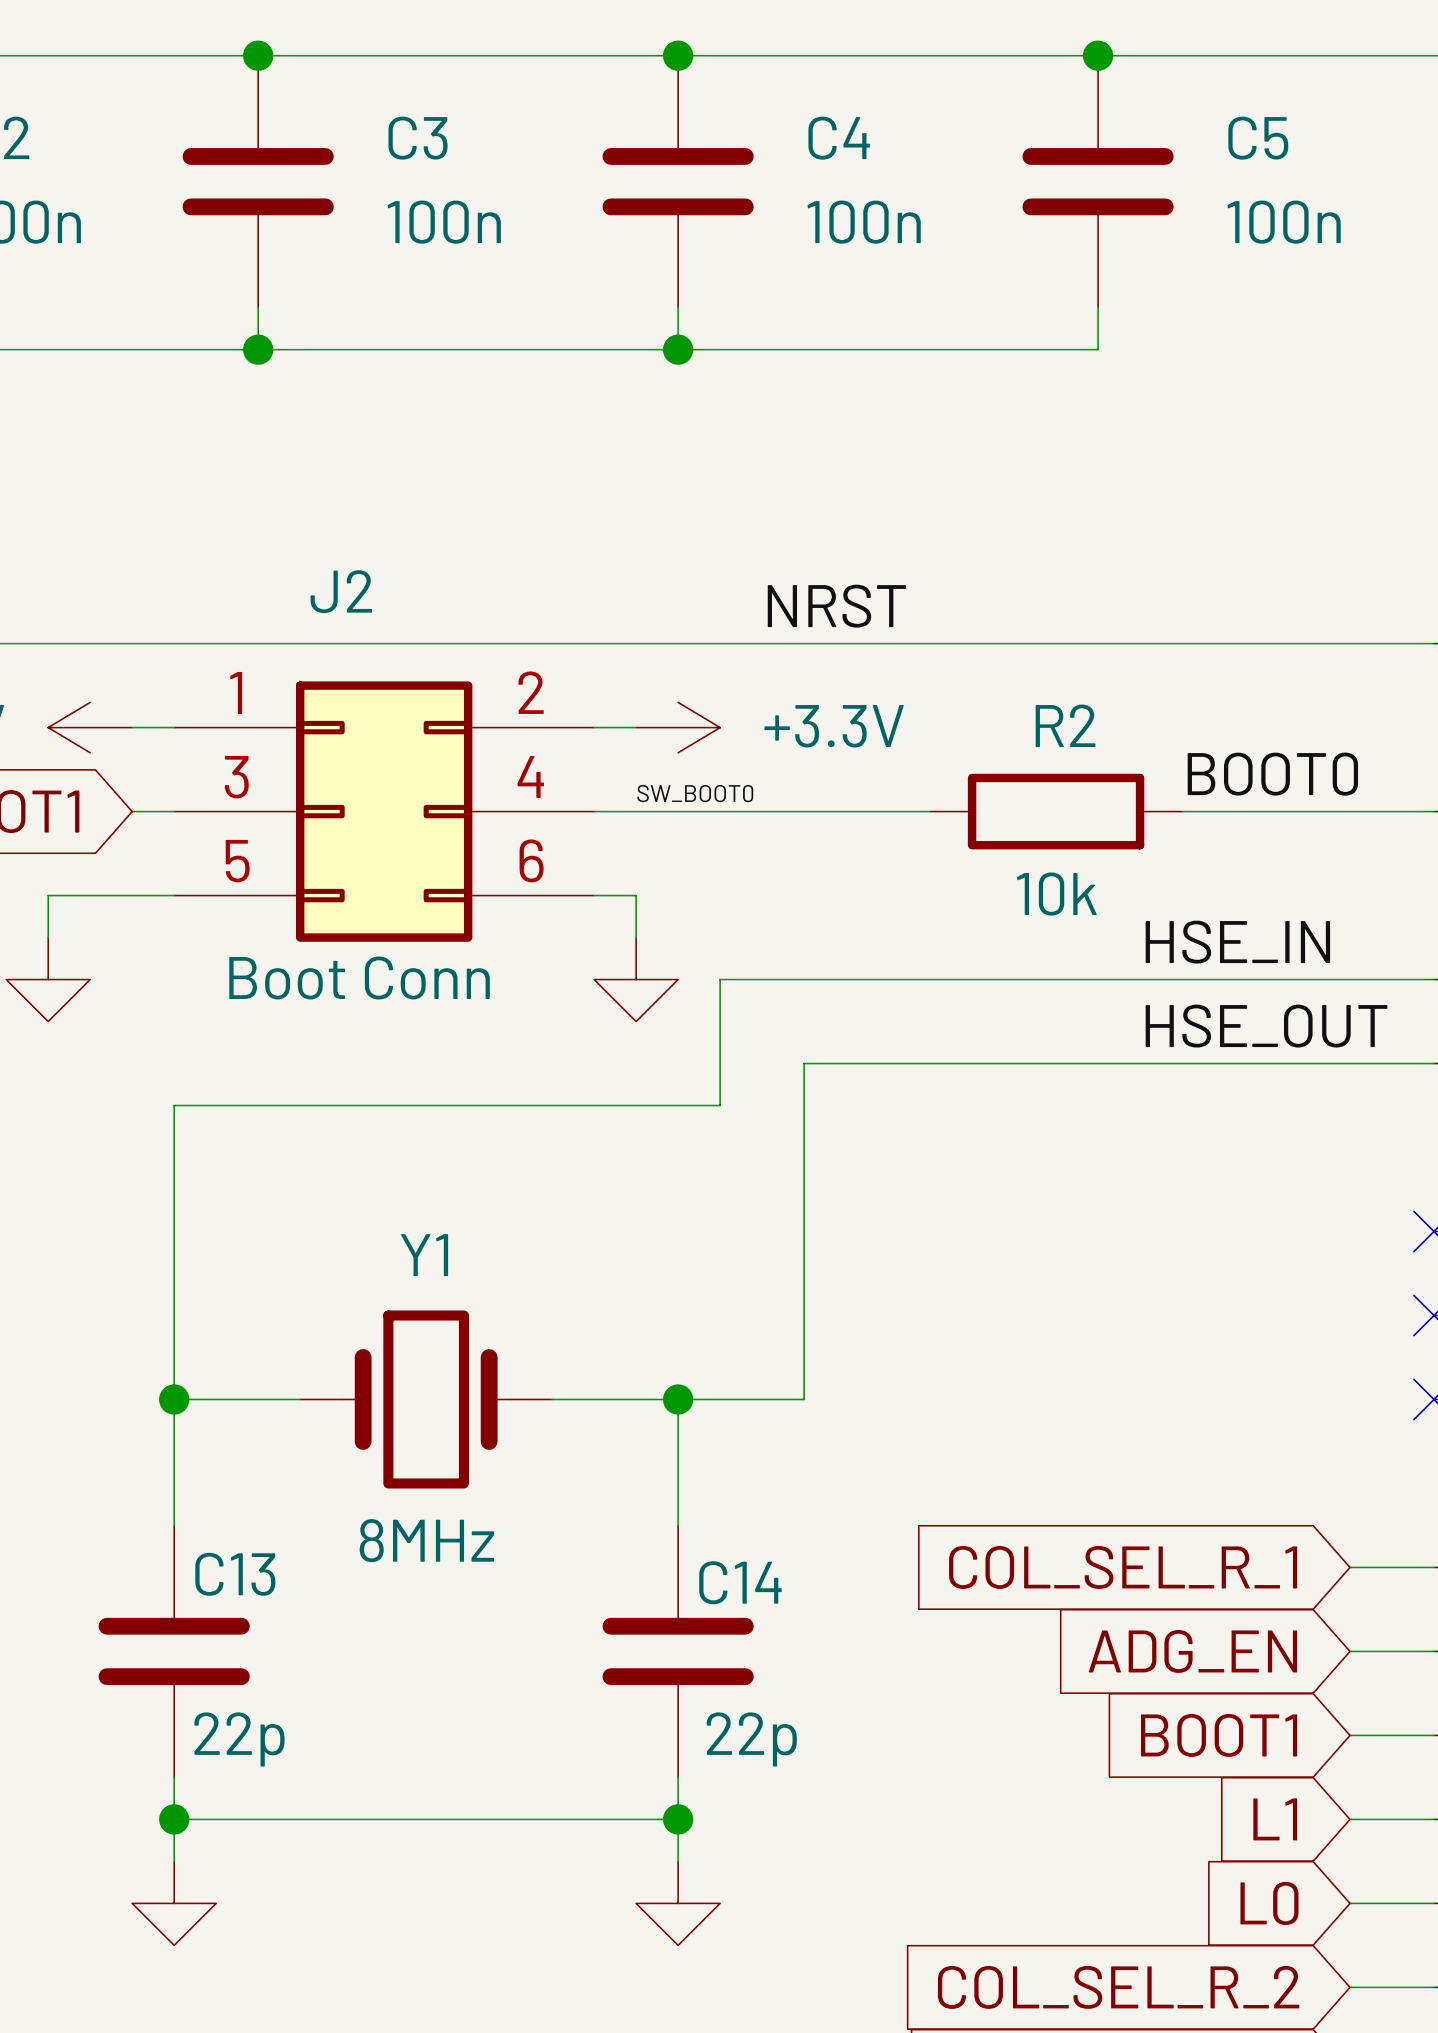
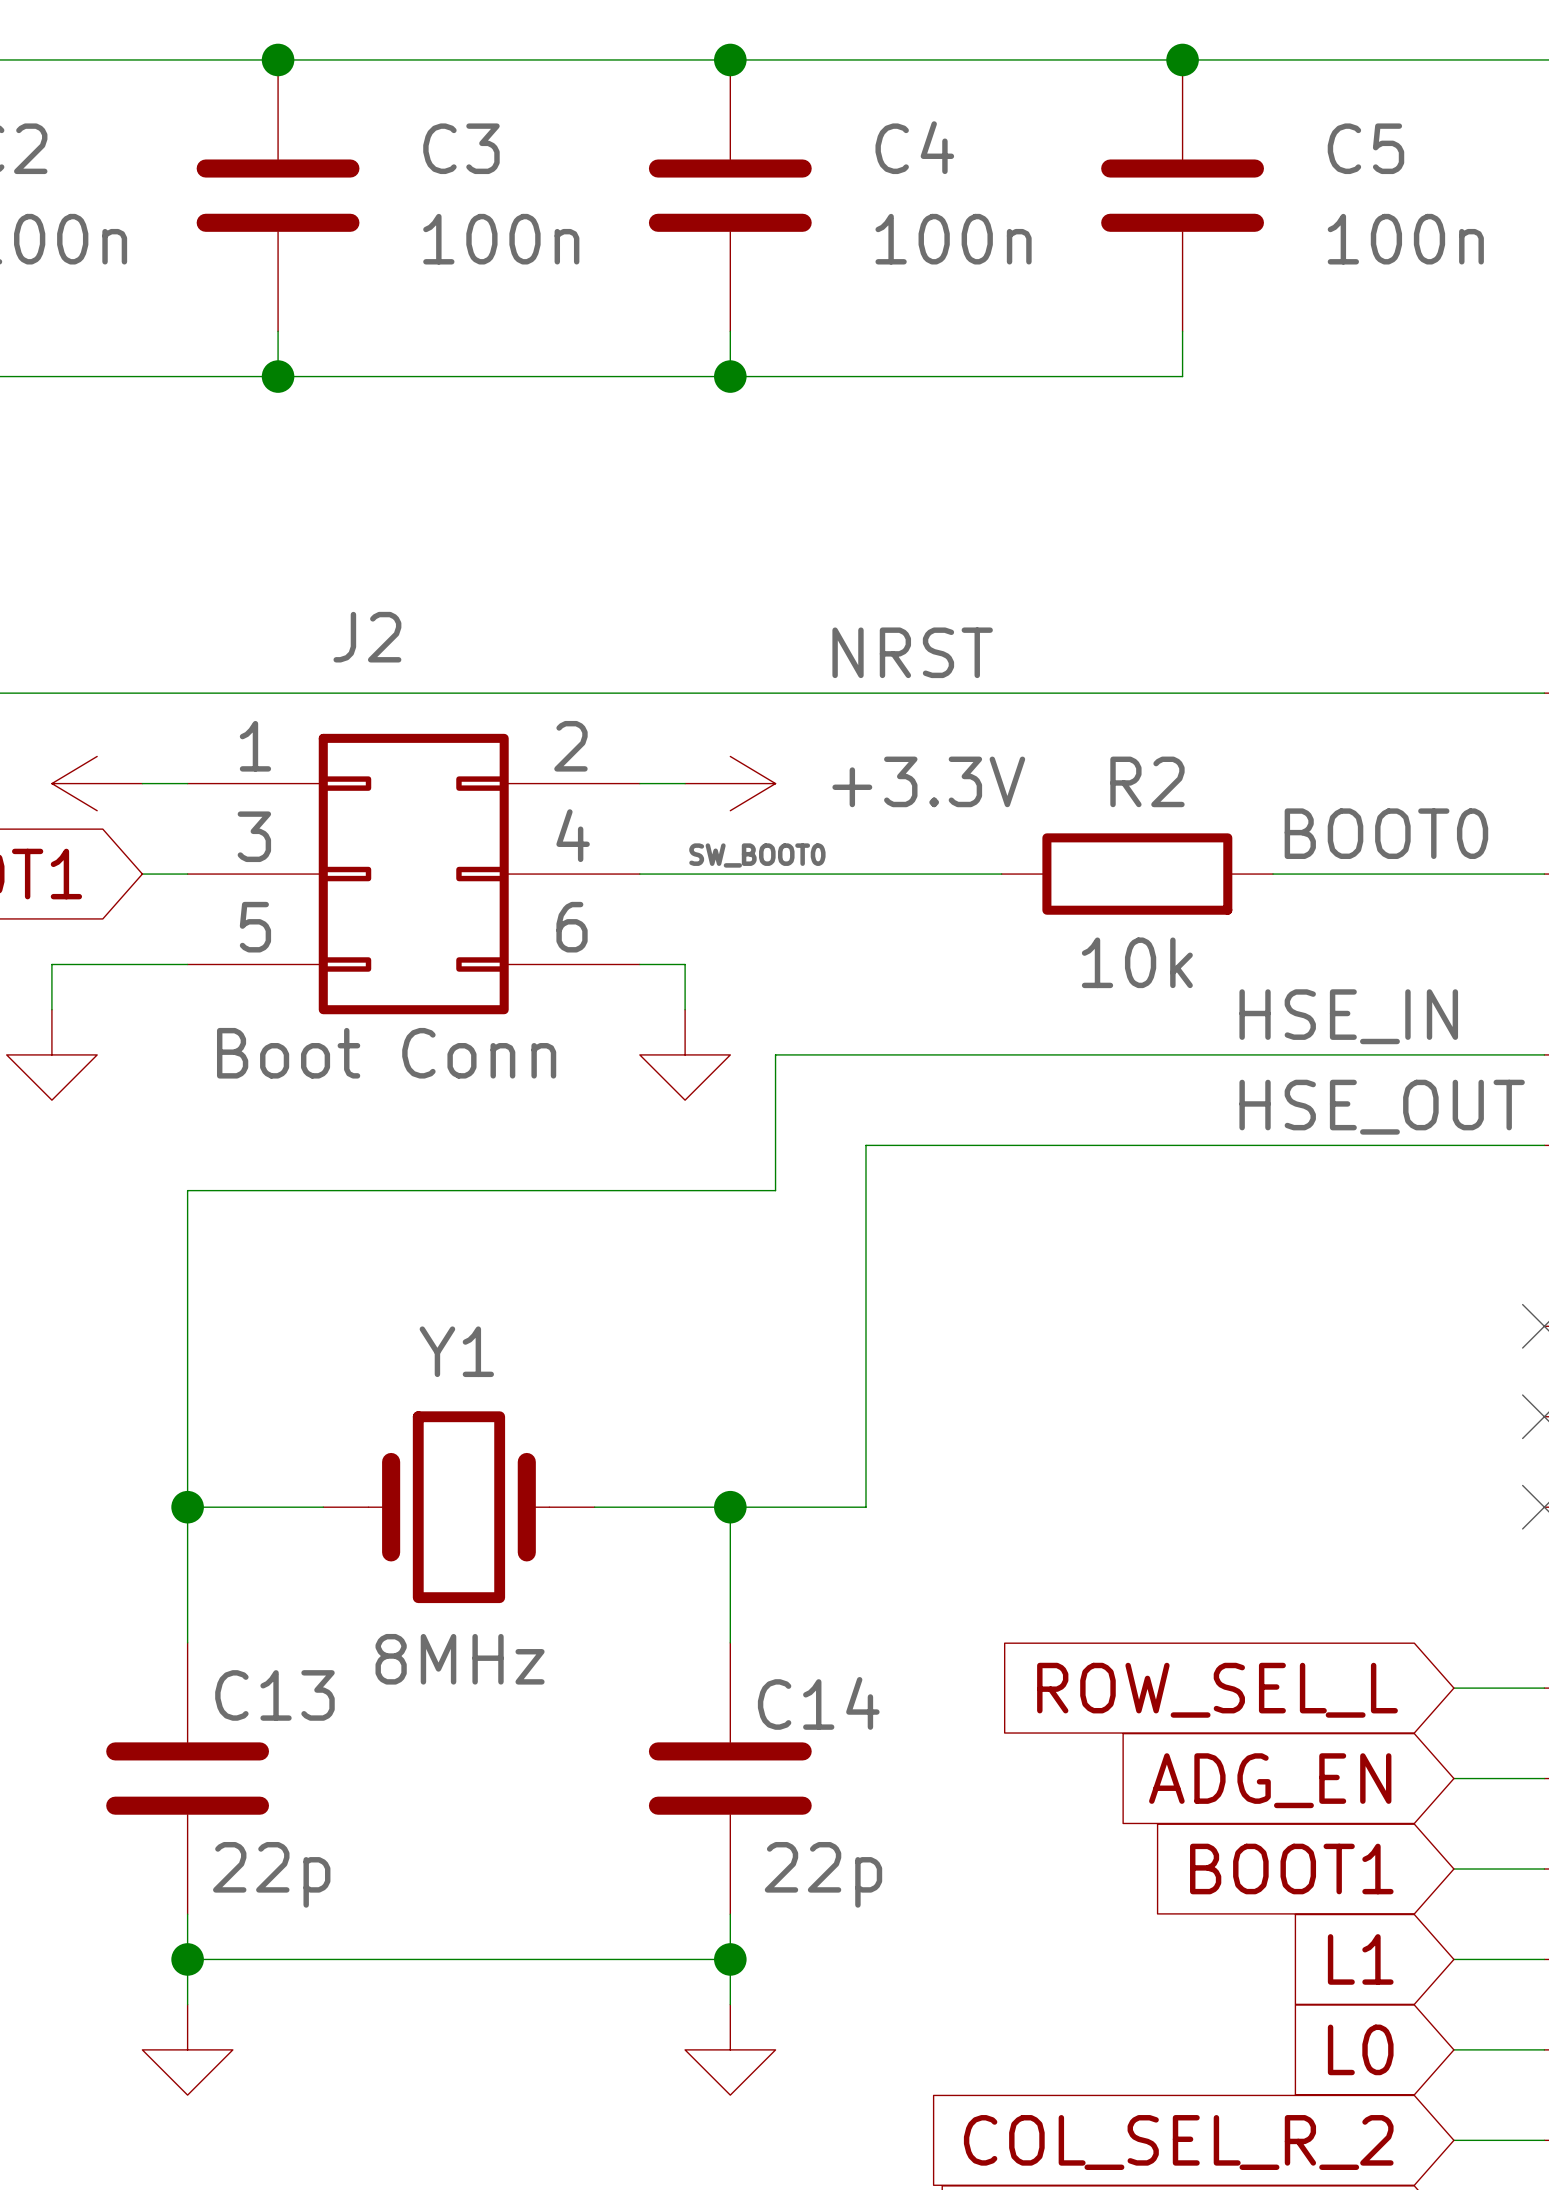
global label: COL_SEL_R_1 (1123, 1567) -> ROW_SEL_L (1217, 1690)

